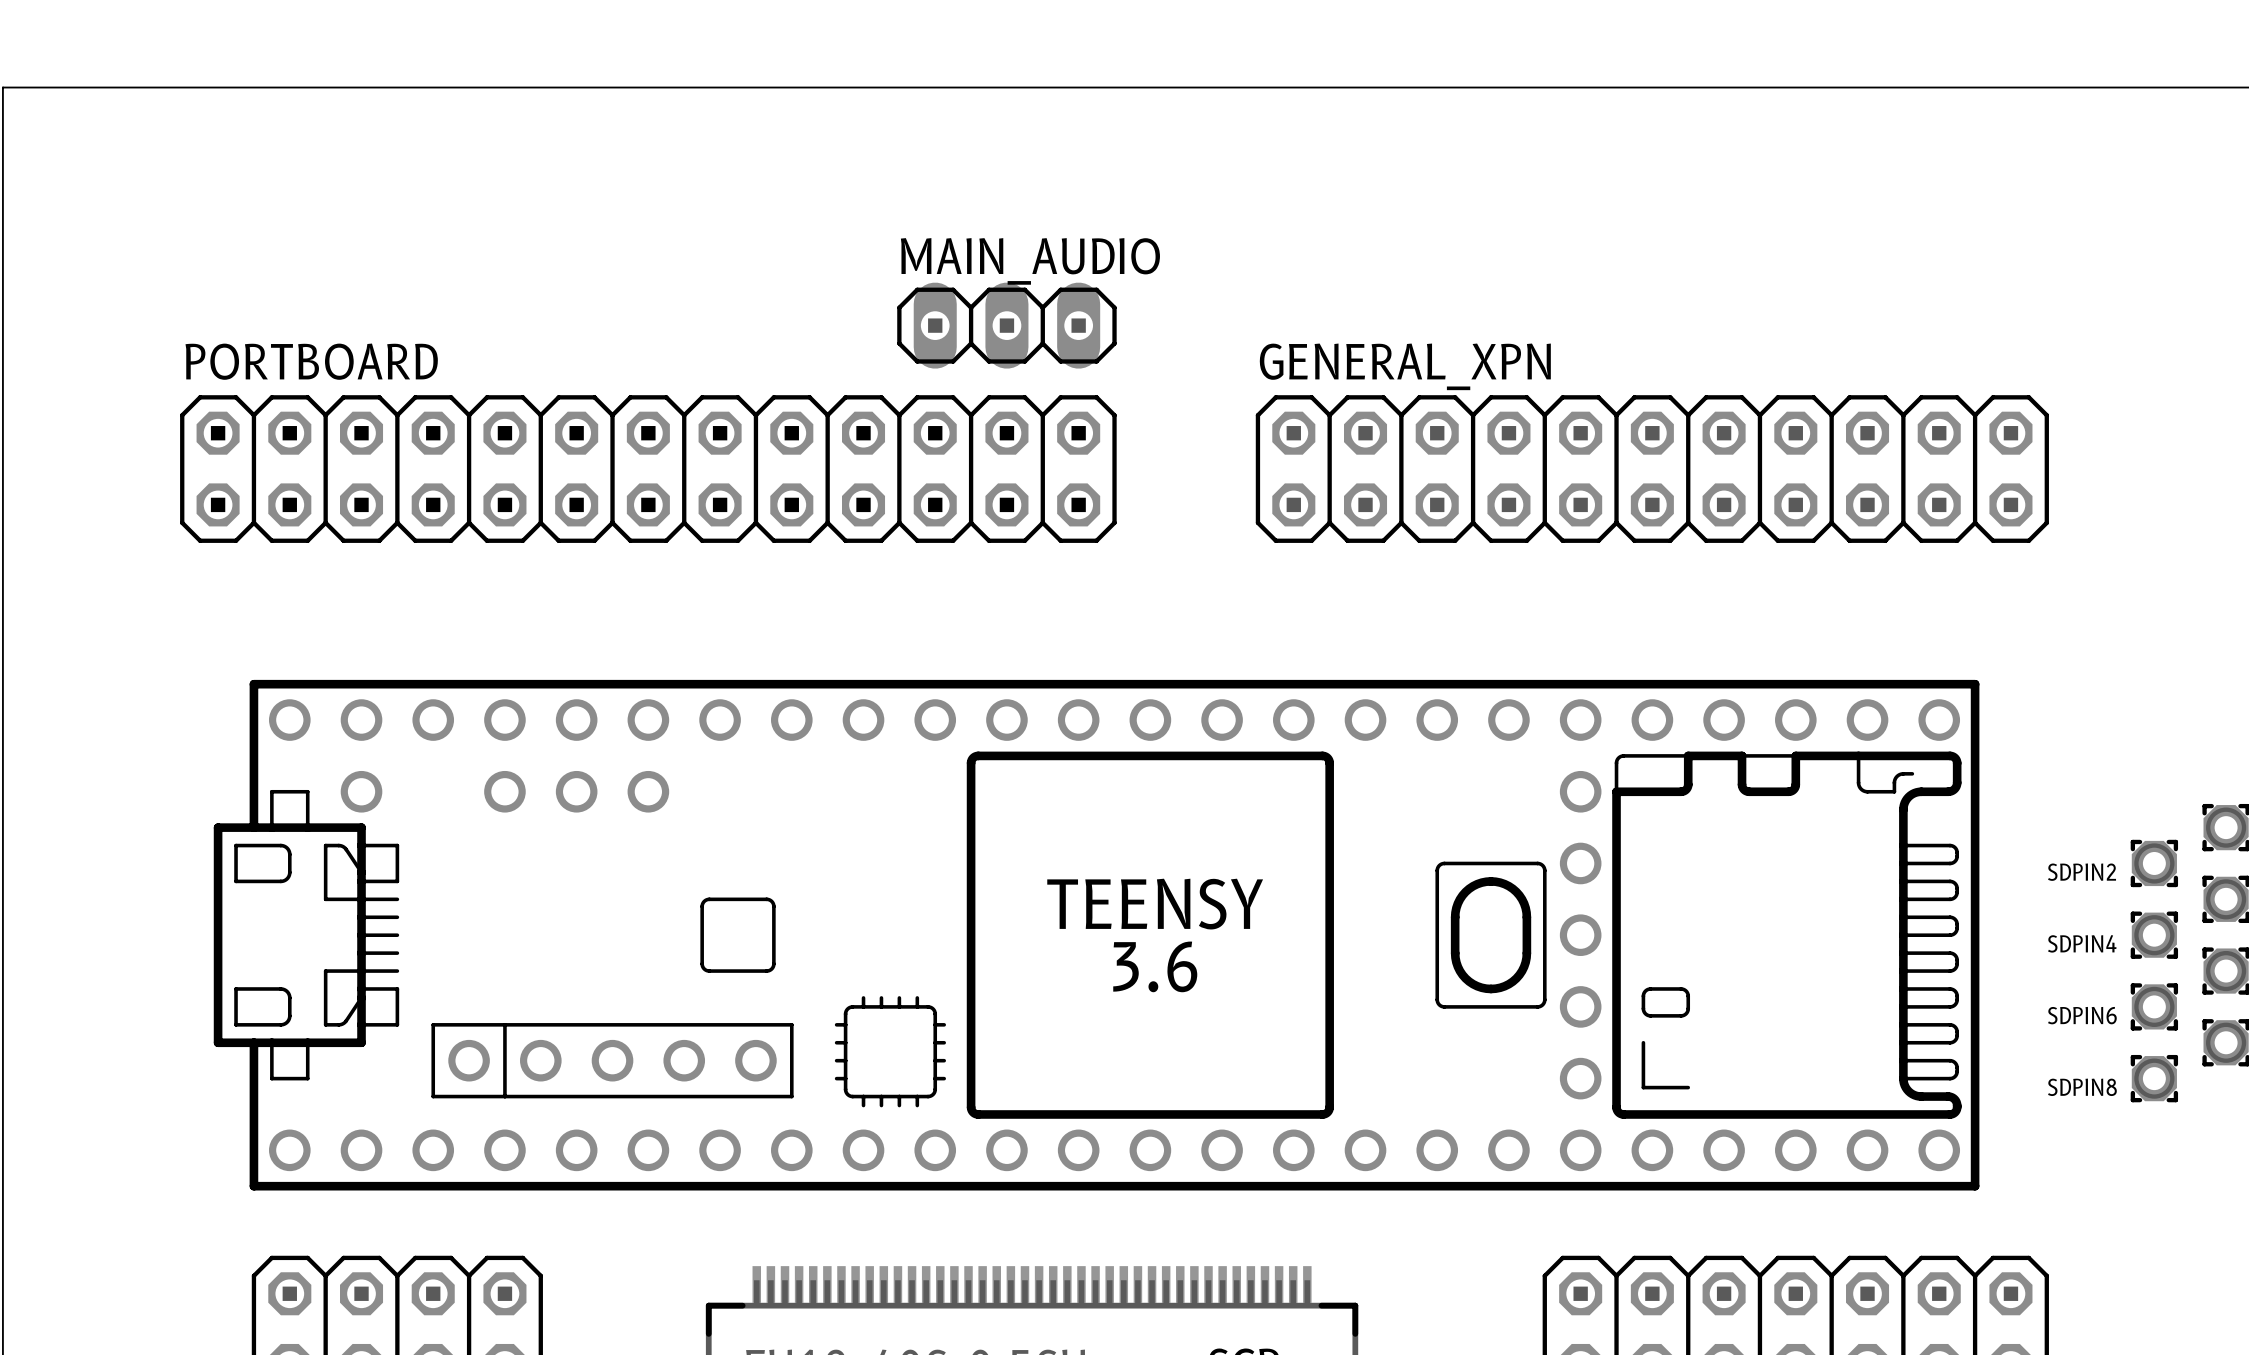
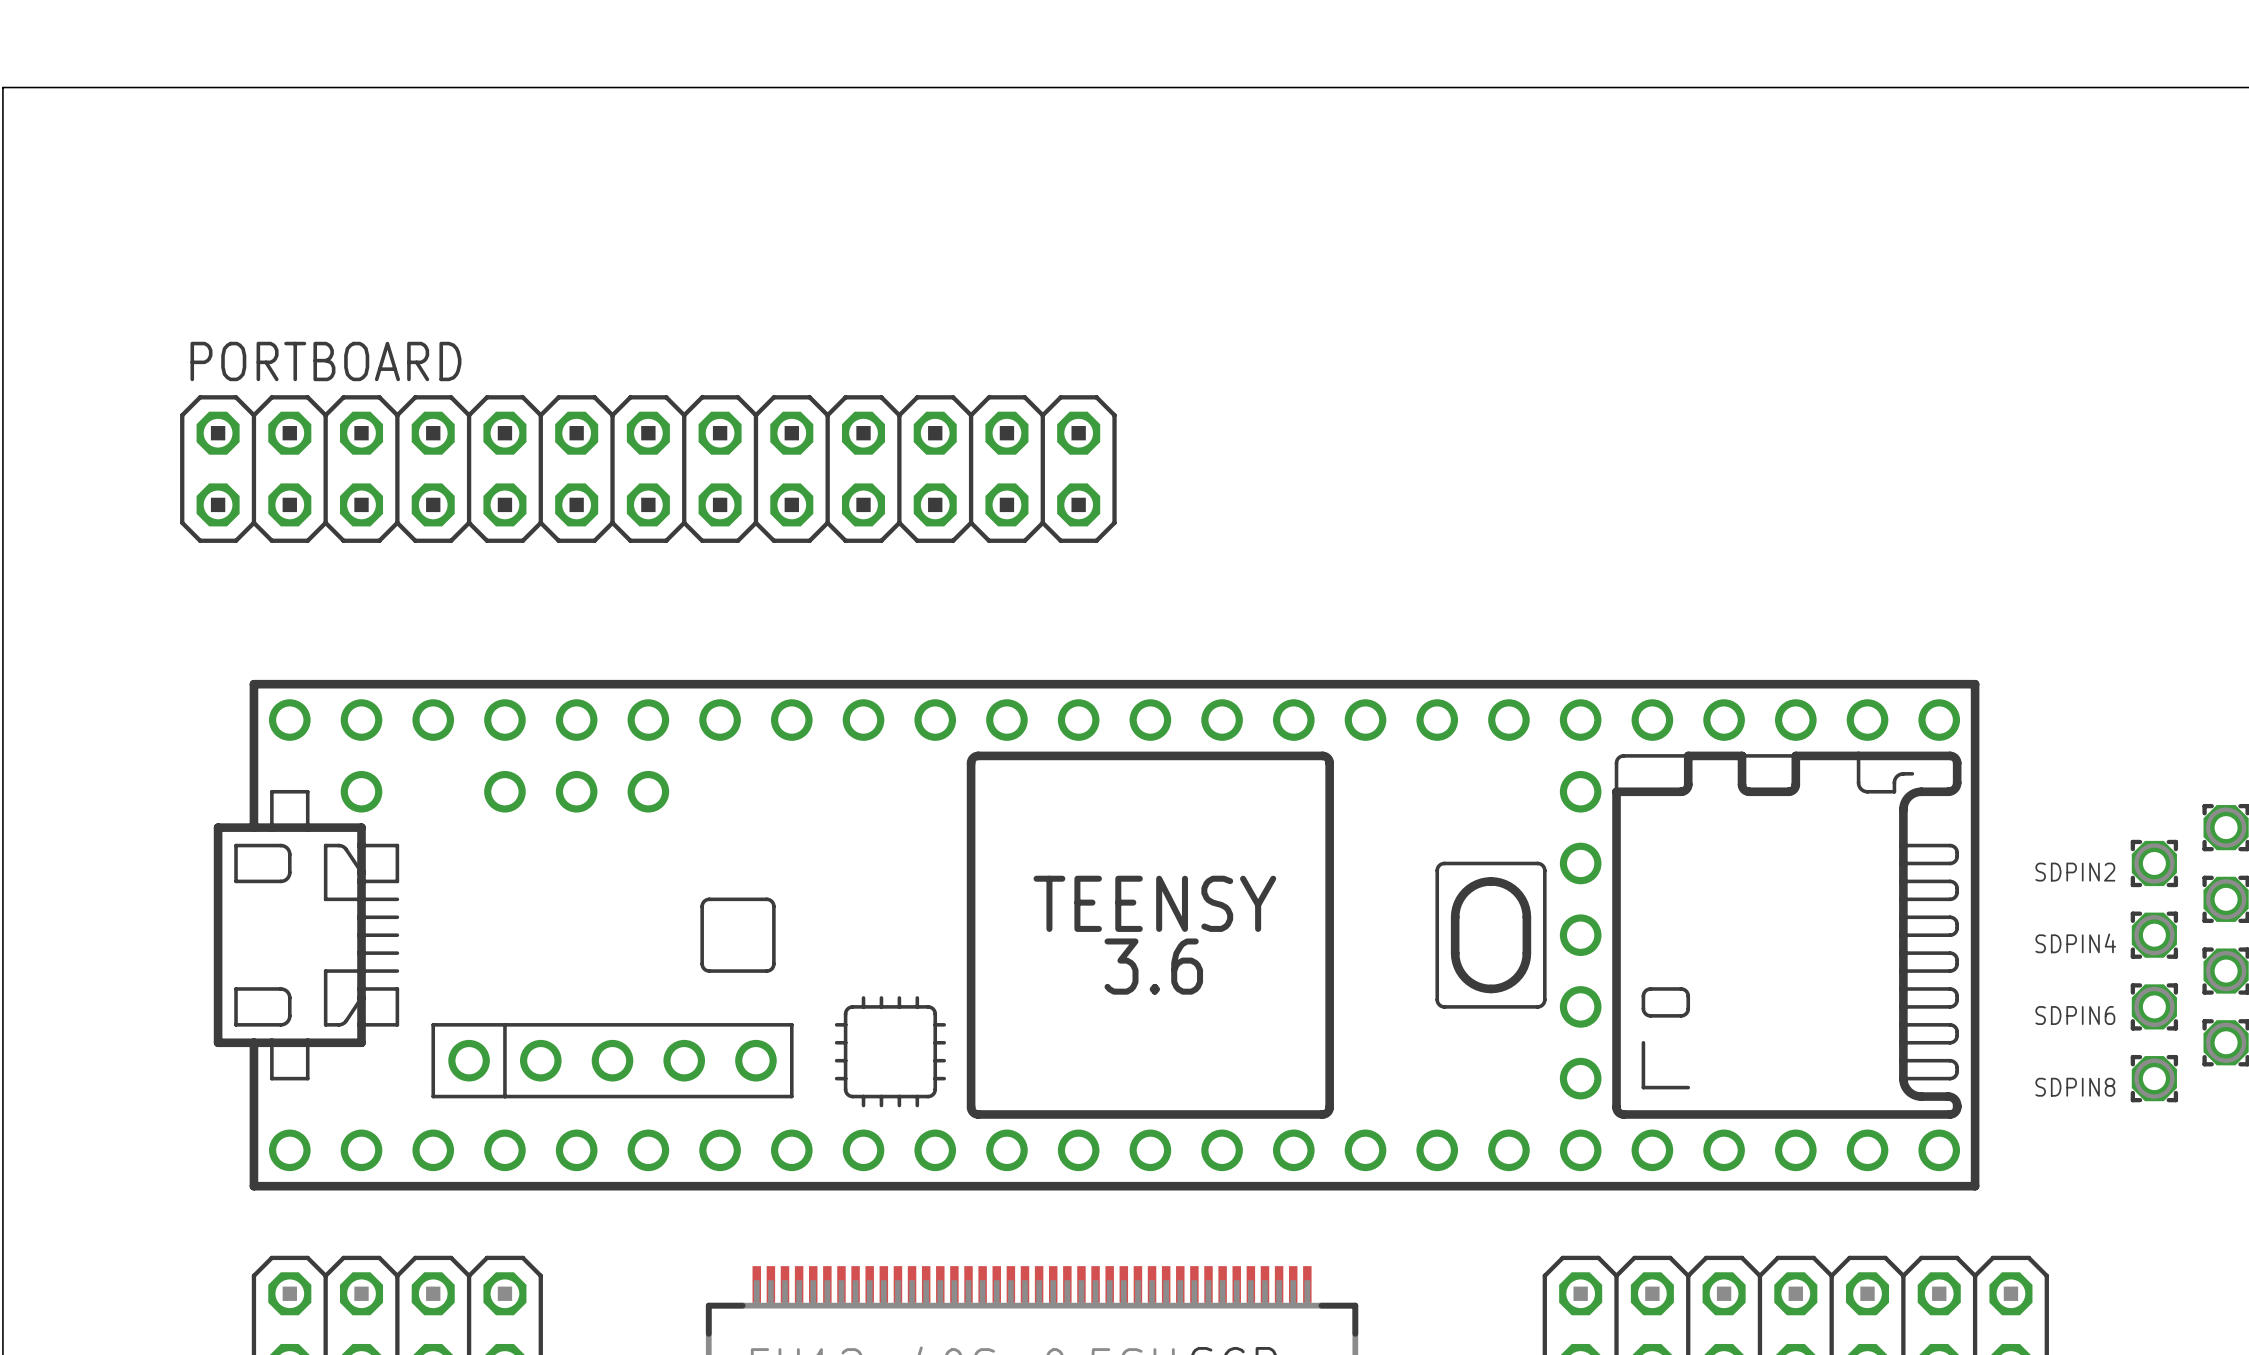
MAIN_AUDIO: (1006, 325) -> none
GENERAL_XPN: (1652, 469) -> none

